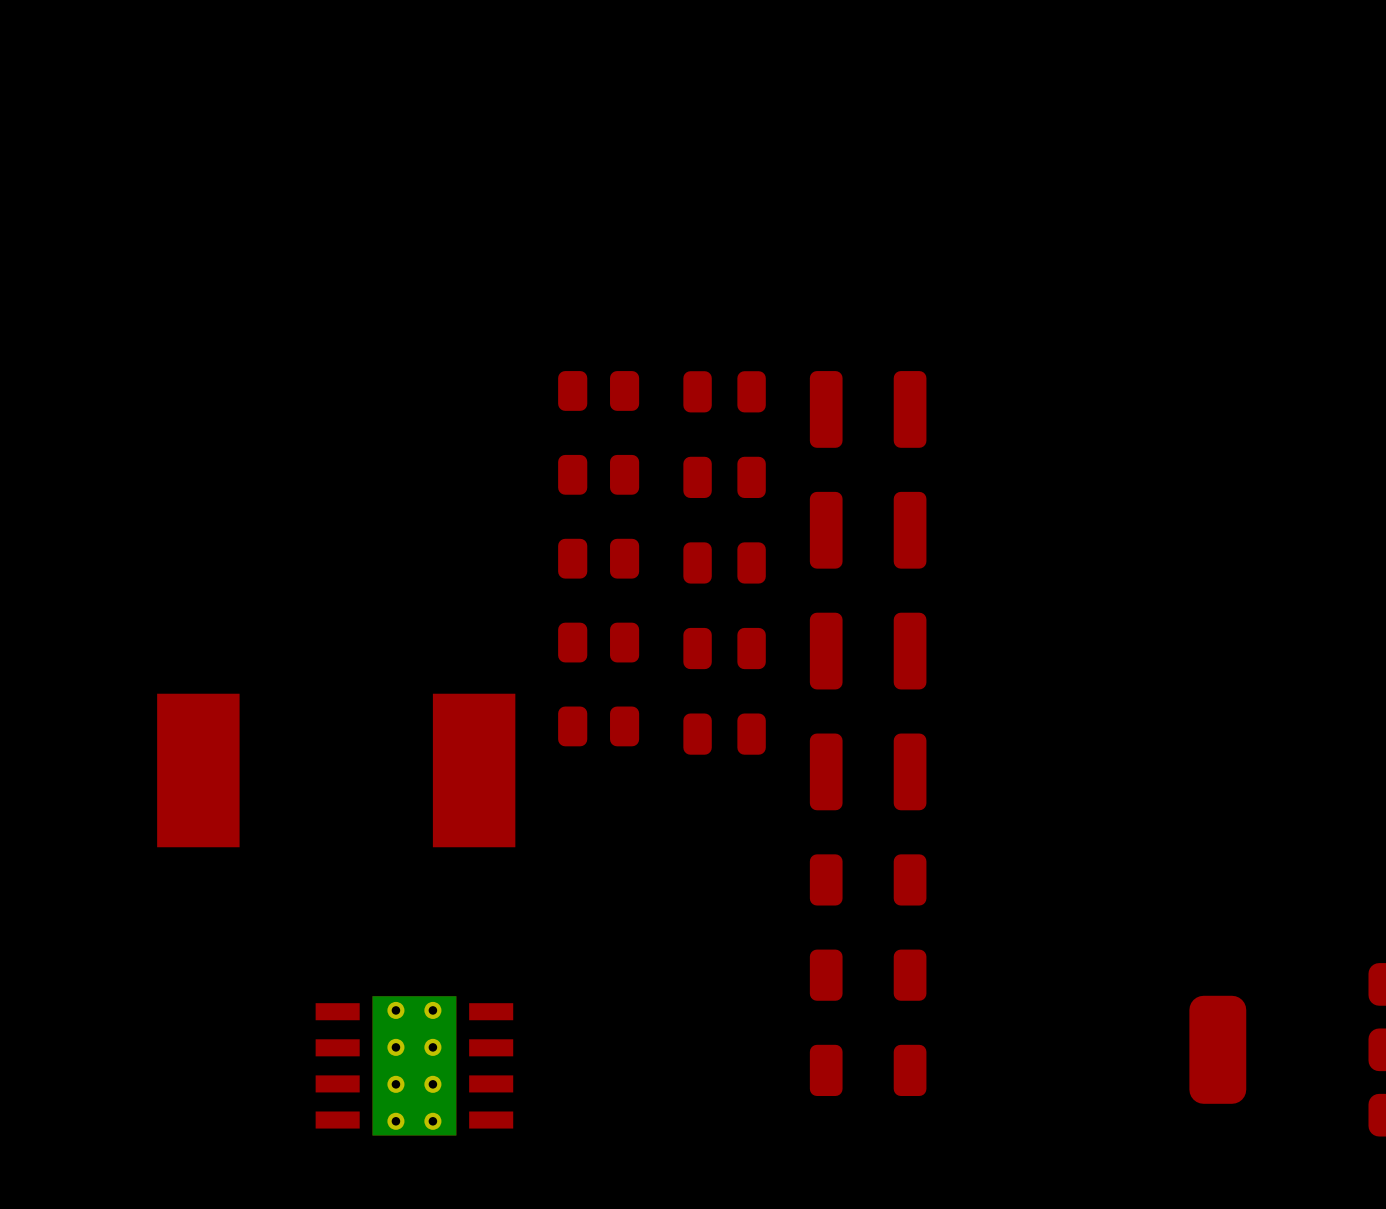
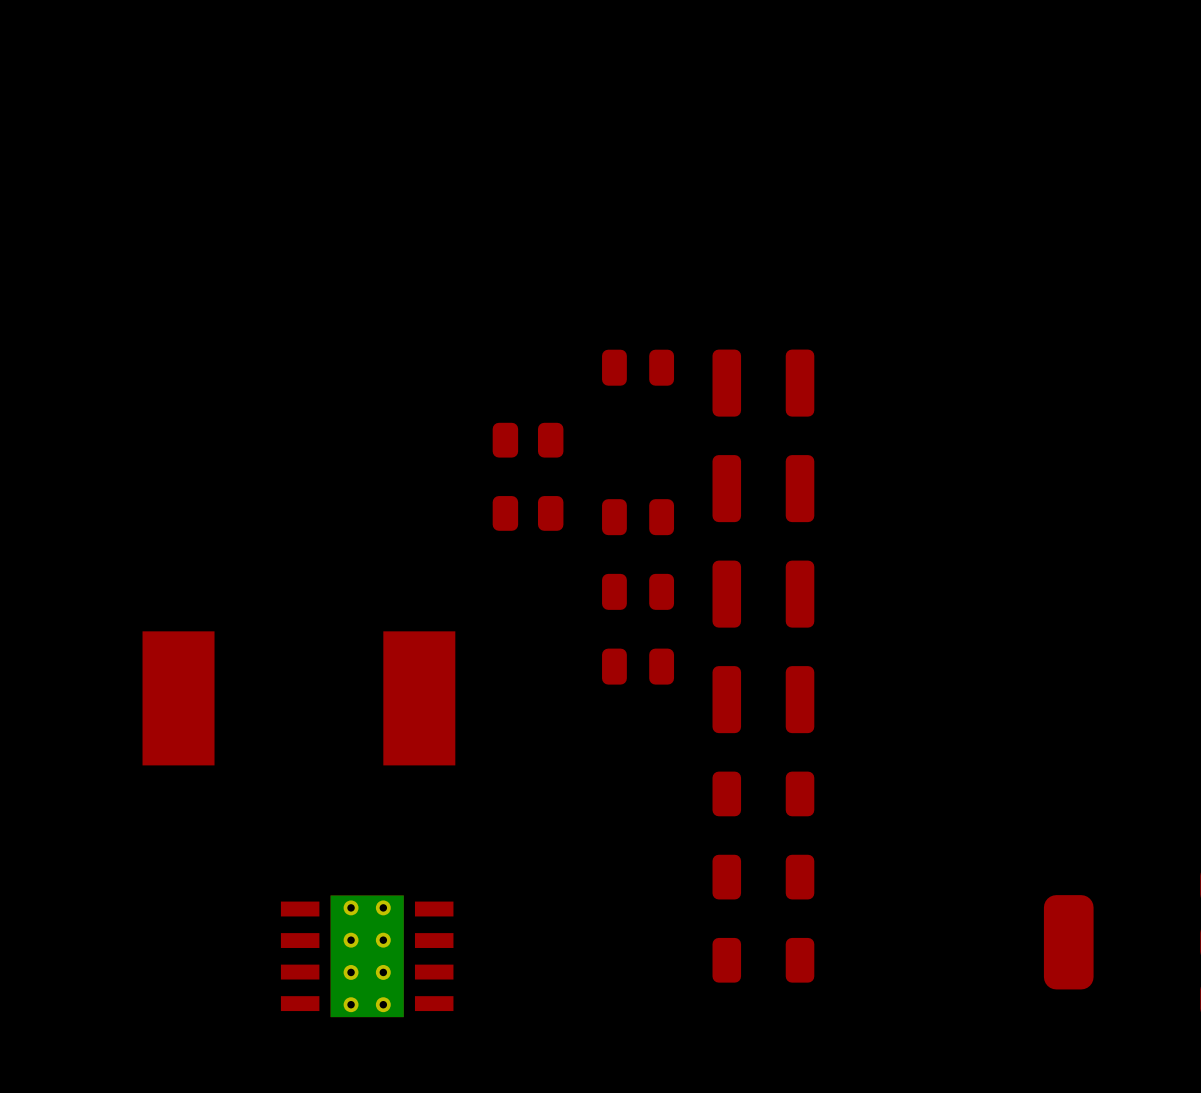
part: (598, 390) -> none
part: (724, 477) -> none
part: (598, 642) -> none
part: (598, 726) -> none

